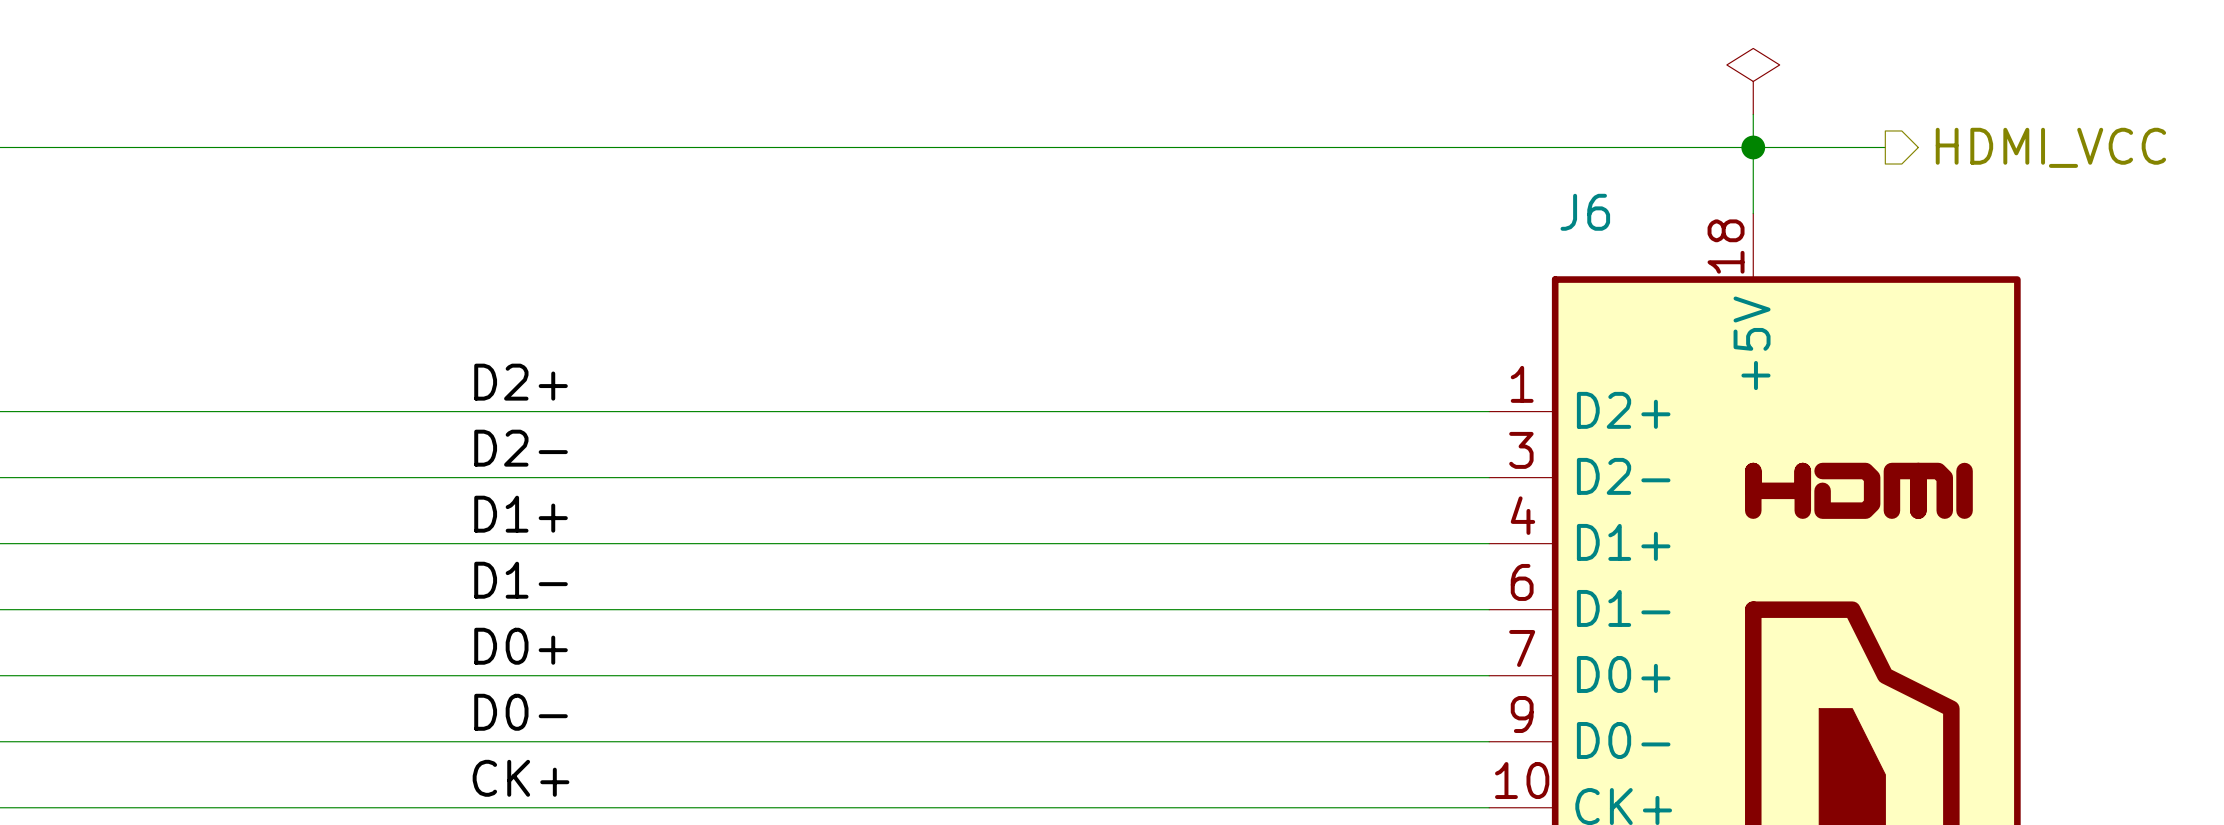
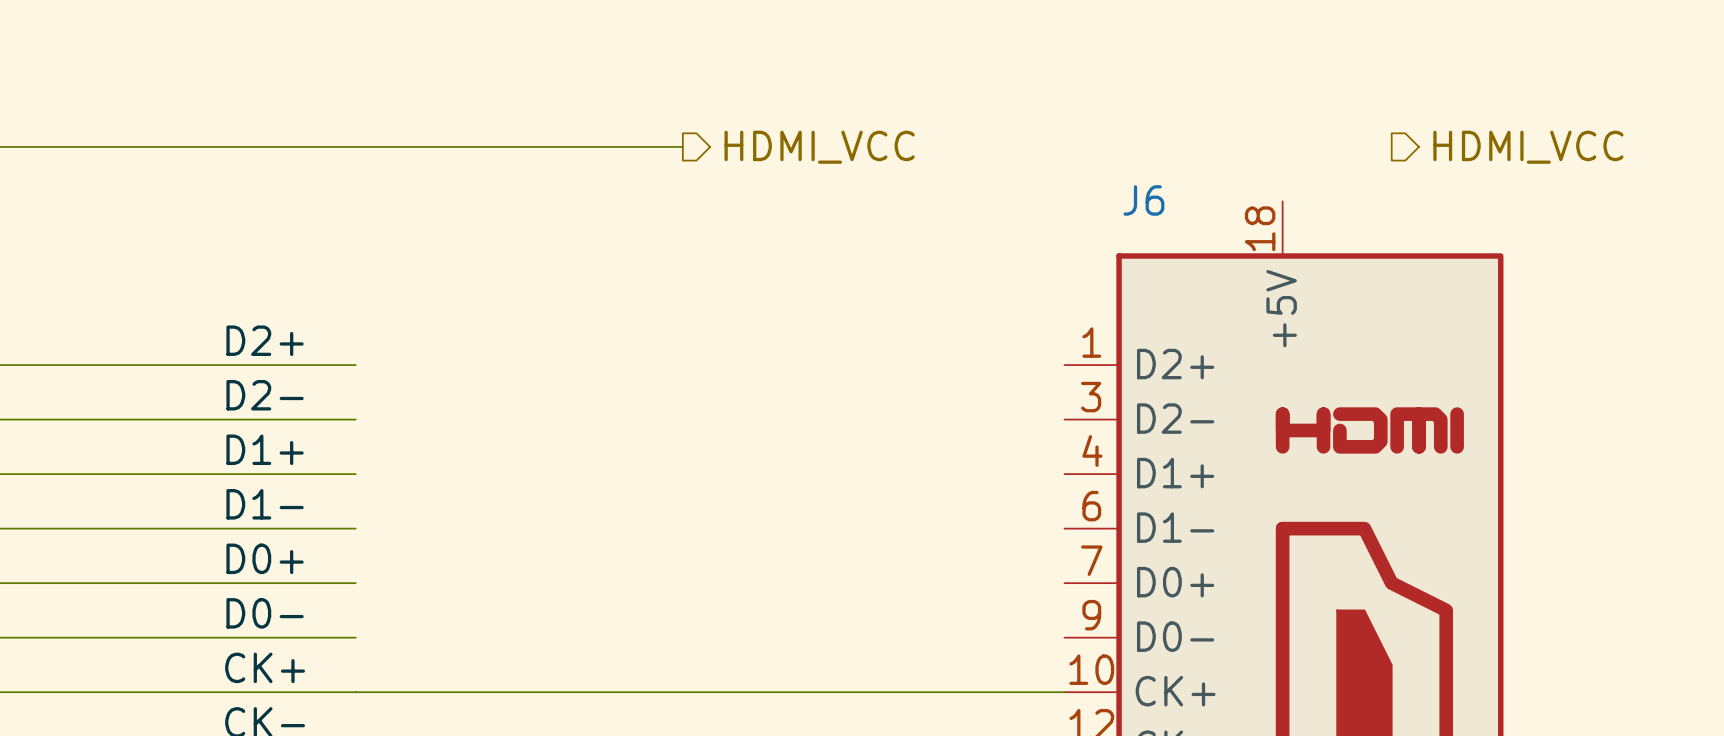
power symbol: (1753, 81) -> none
wire: (1753, 114) (1753, 213) -> none
wire: (1026, 147) (1885, 147) -> none
hierarchical label: none -> HDMI_VCC (819, 147)
junction: (1753, 147) -> none
wire: (630, 411) (1489, 411) -> none
wire: (630, 477) (1489, 477) -> none
wire: (630, 543) (1489, 543) -> none
wire: (630, 609) (1489, 609) -> none
wire: (630, 675) (1489, 675) -> none
wire: (630, 741) (1489, 741) -> none

